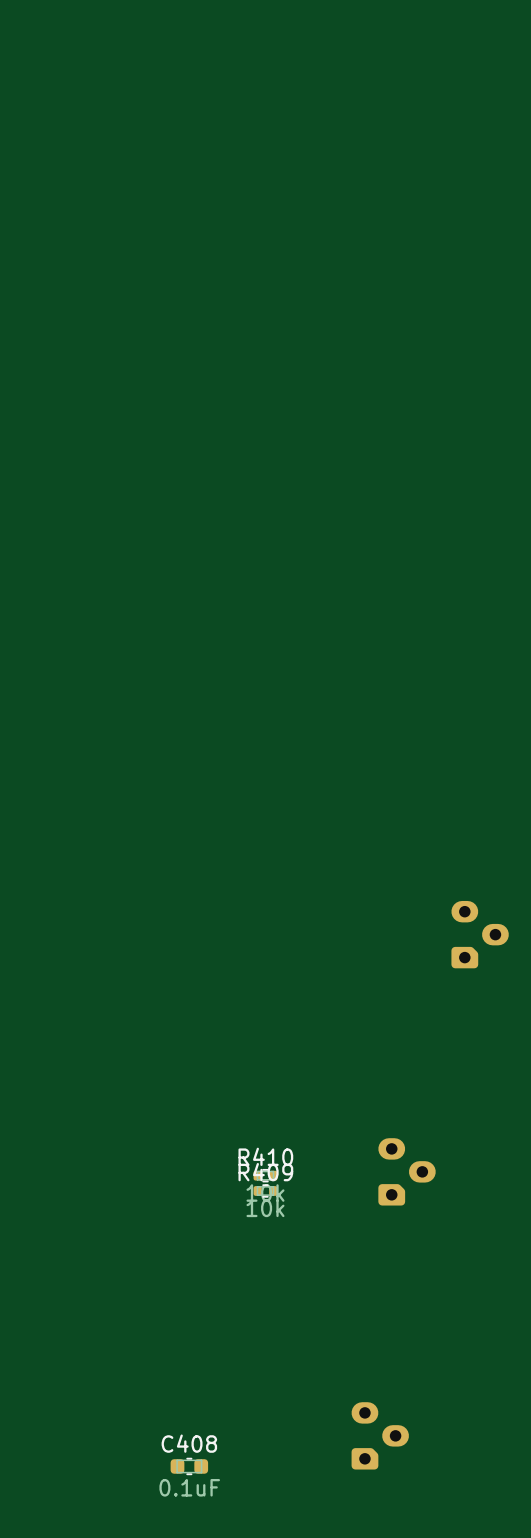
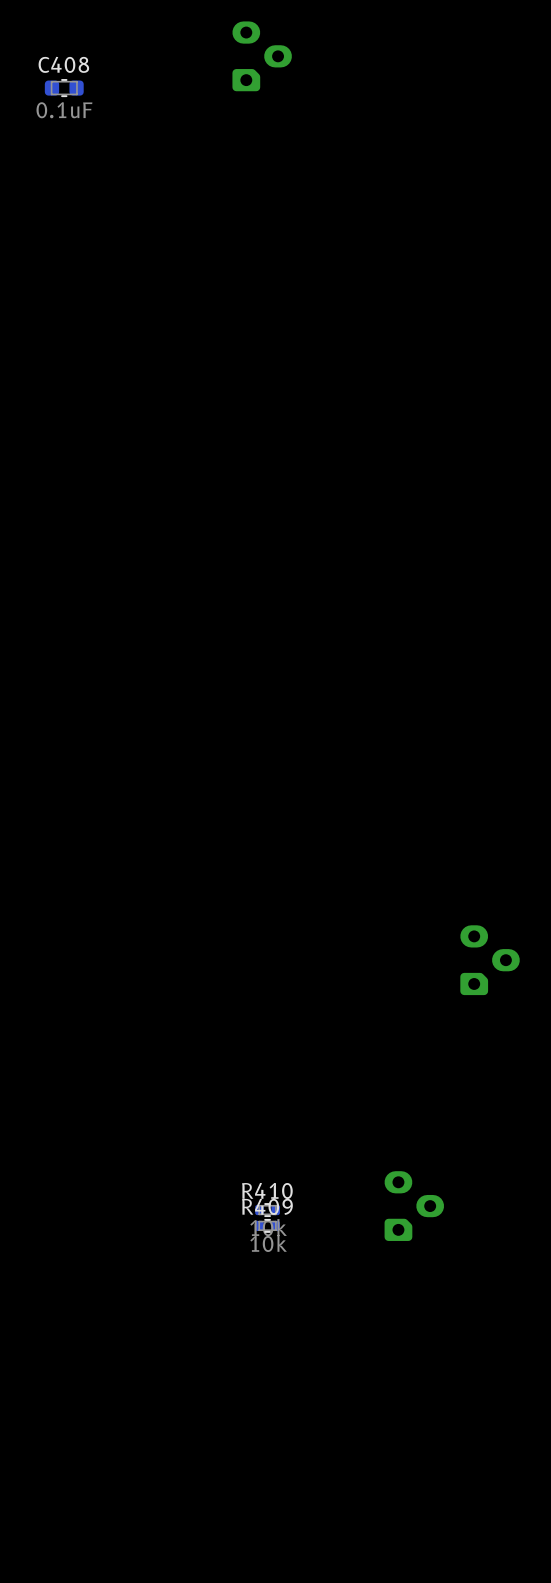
part: none -> (262, 56)
part: (380, 1435) -> none
C408 position: (189, 1466) -> (64, 88)

